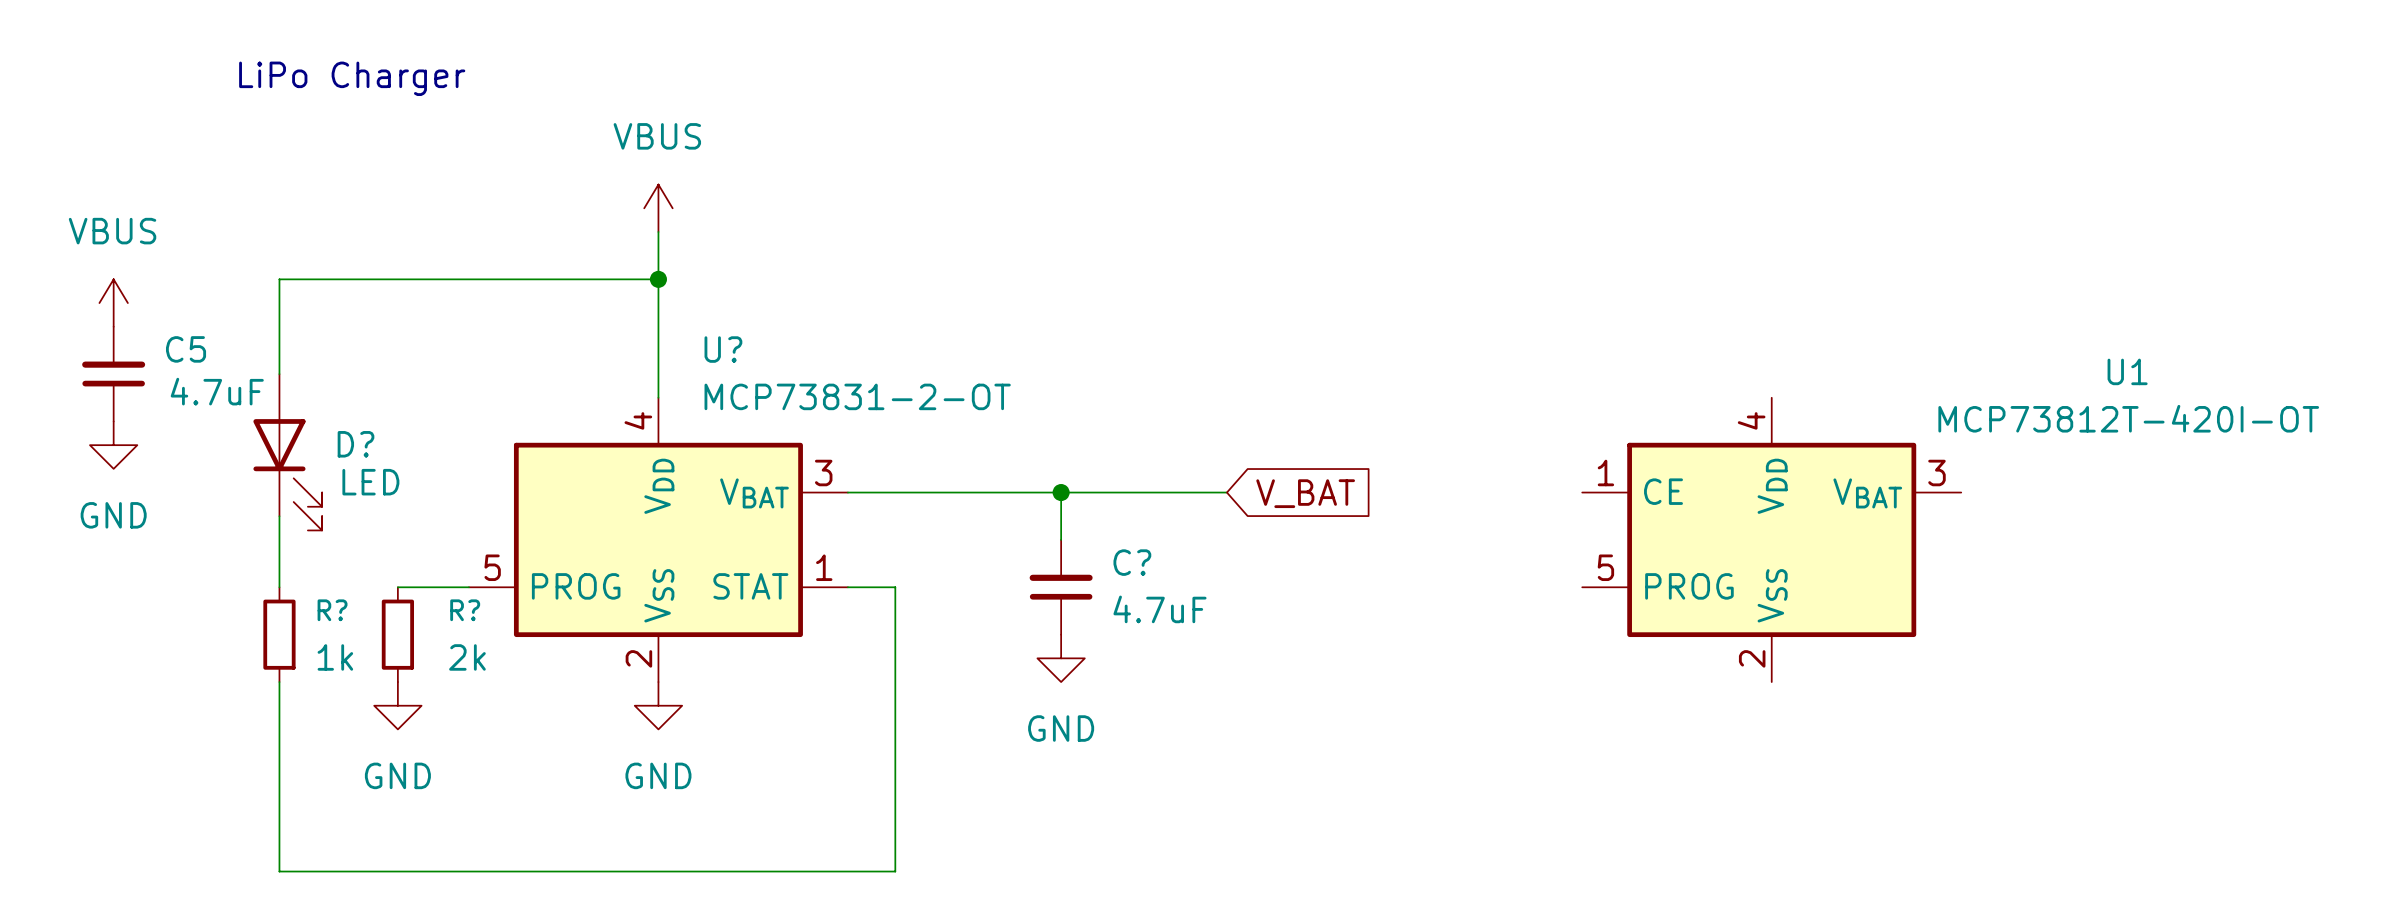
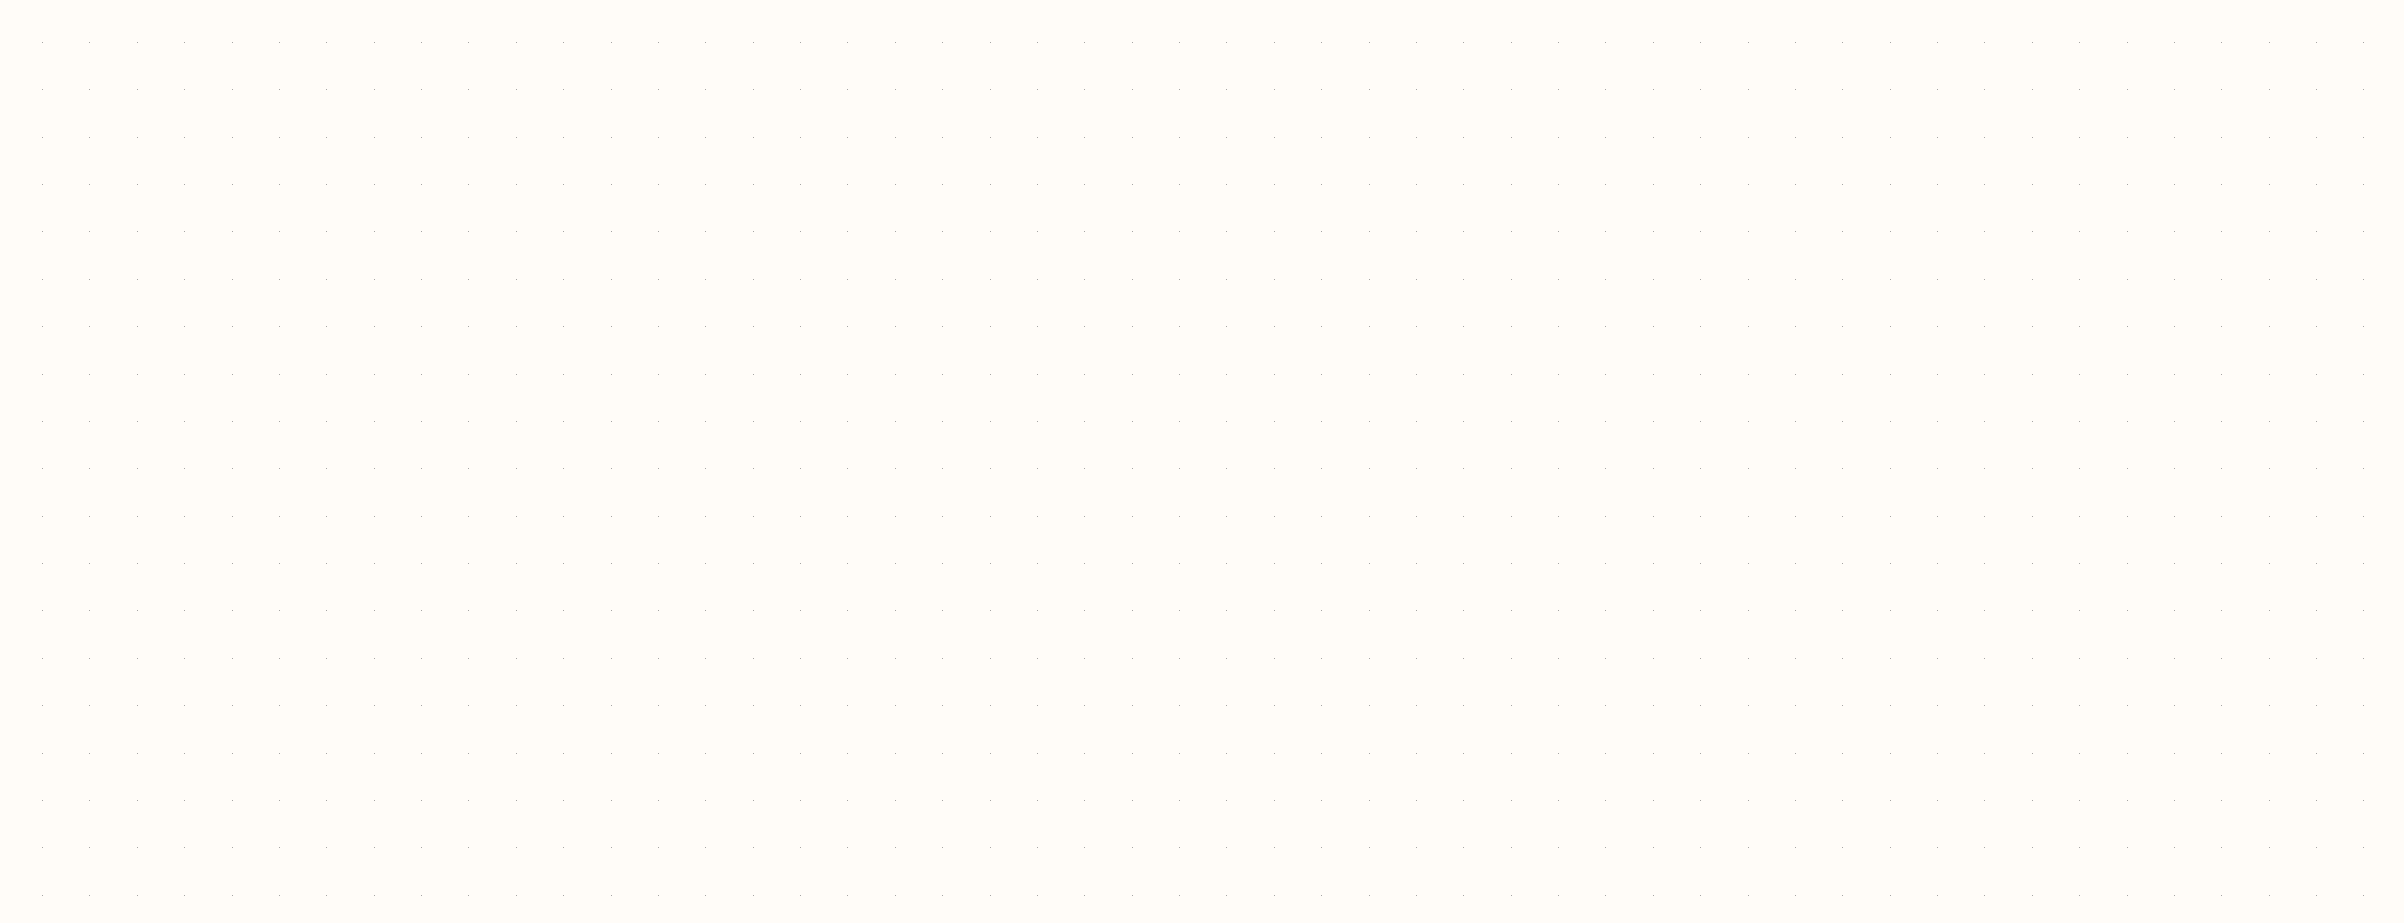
text: LiPo Charger (352, 78) -> none
power symbol: VBUS (658, 208) -> none
wire: (658, 231) (658, 397) -> none
wire: (658, 279) (279, 279) (279, 374) -> none
junction: (658, 279) -> none
power symbol: VBUS (113, 303) -> none
C5: 4.7uF (113, 374) -> none
power symbol: GND (113, 445) -> none
D?: LED (287, 452) -> none
wire: (847, 492) (1226, 492) -> none
wire: (1061, 492) (1061, 539) -> none
junction: (1061, 492) -> none
global label: V_BAT (1305, 493) -> none
wire: (279, 516) (279, 587) -> none
U?: MCP73831-2-OT (658, 539) -> none
U1: MCP73812T-420I-OT (1771, 539) -> none
wire: (397, 587) (468, 587) -> none
wire: (847, 587) (895, 587) (895, 871) (279, 871) (279, 682) -> none
C?: 4.7uF (1061, 587) -> none
R?: 1k (279, 634) -> none
R?: 2k (397, 634) -> none
power symbol: GND (1061, 658) -> none
power symbol: GND (397, 705) -> none
power symbol: GND (658, 705) -> none

